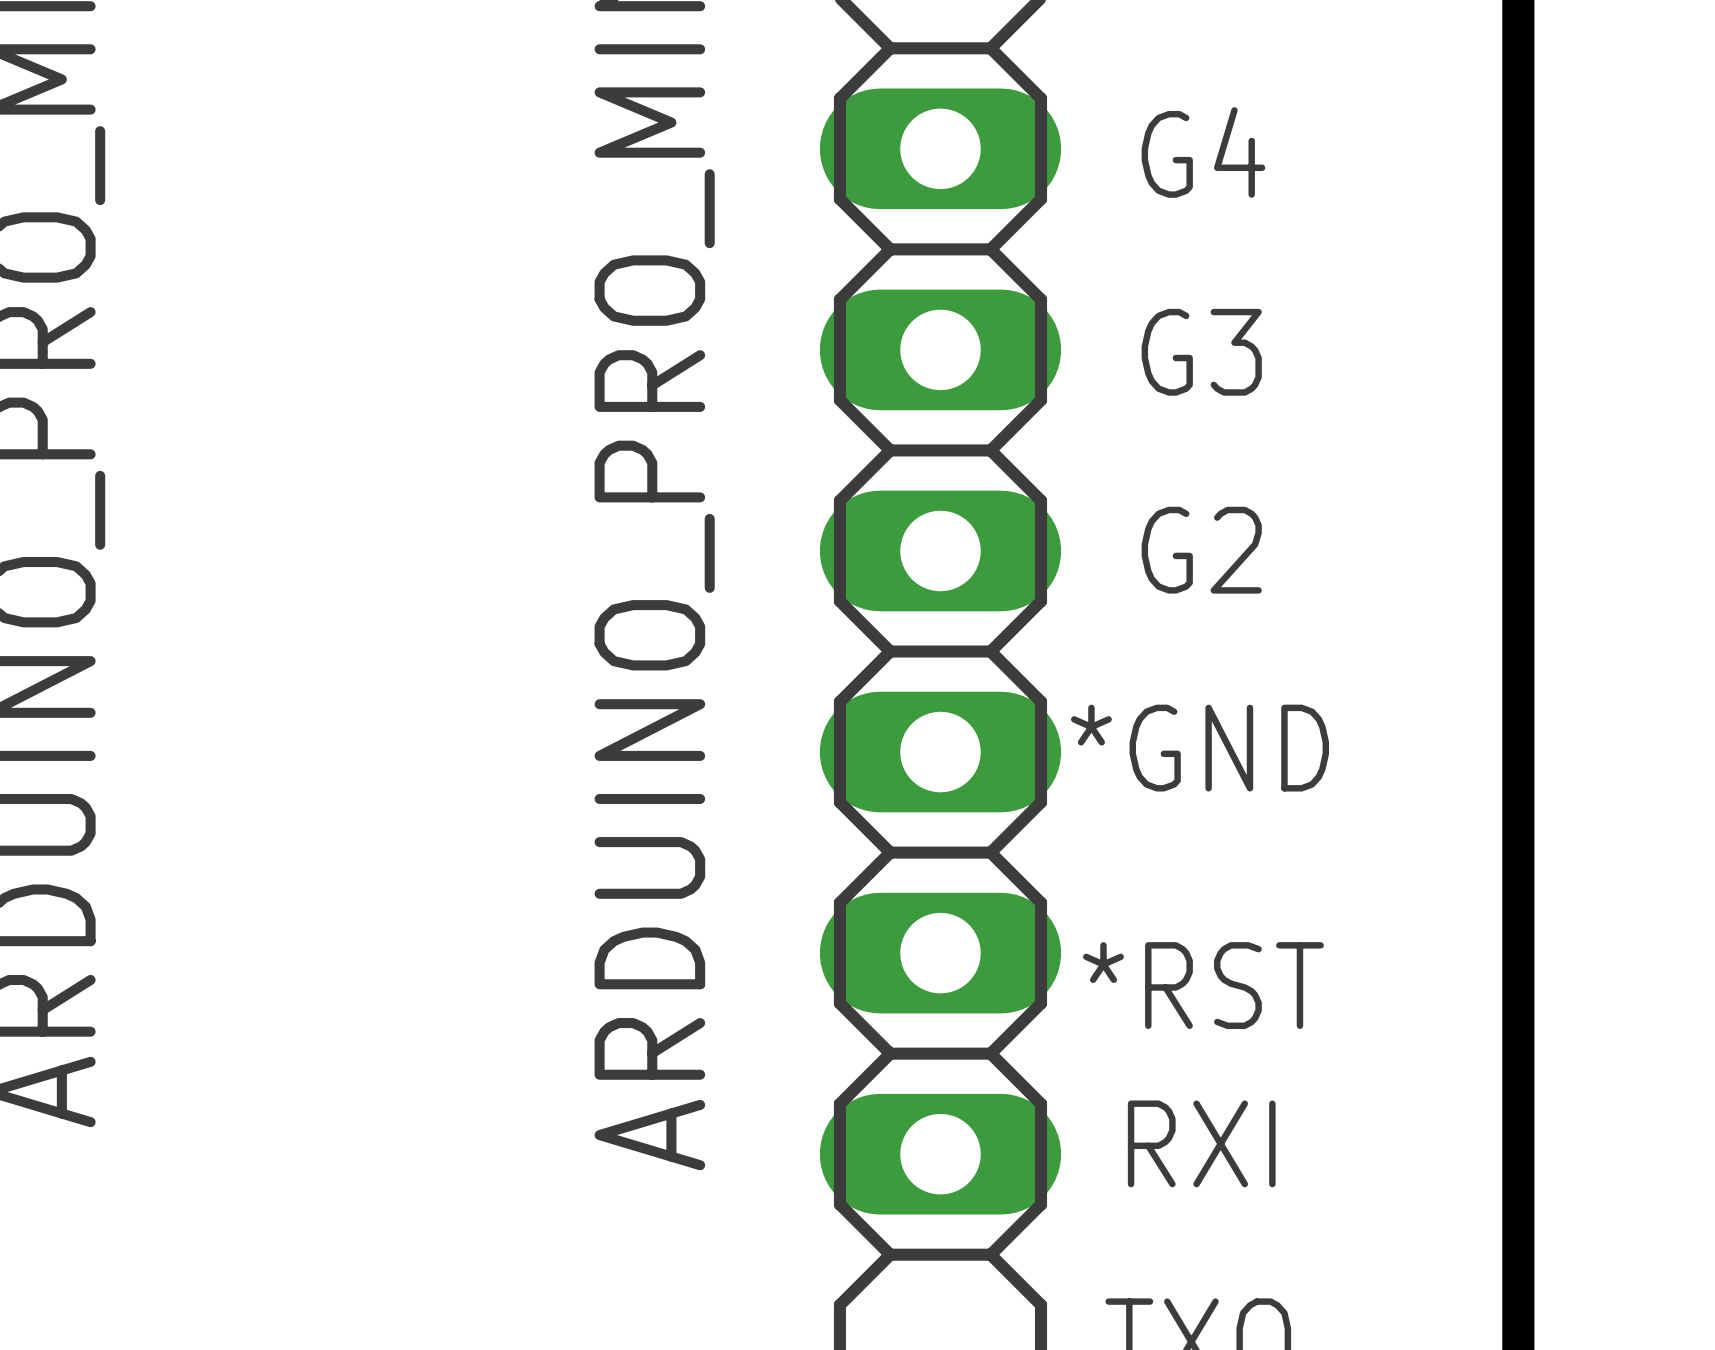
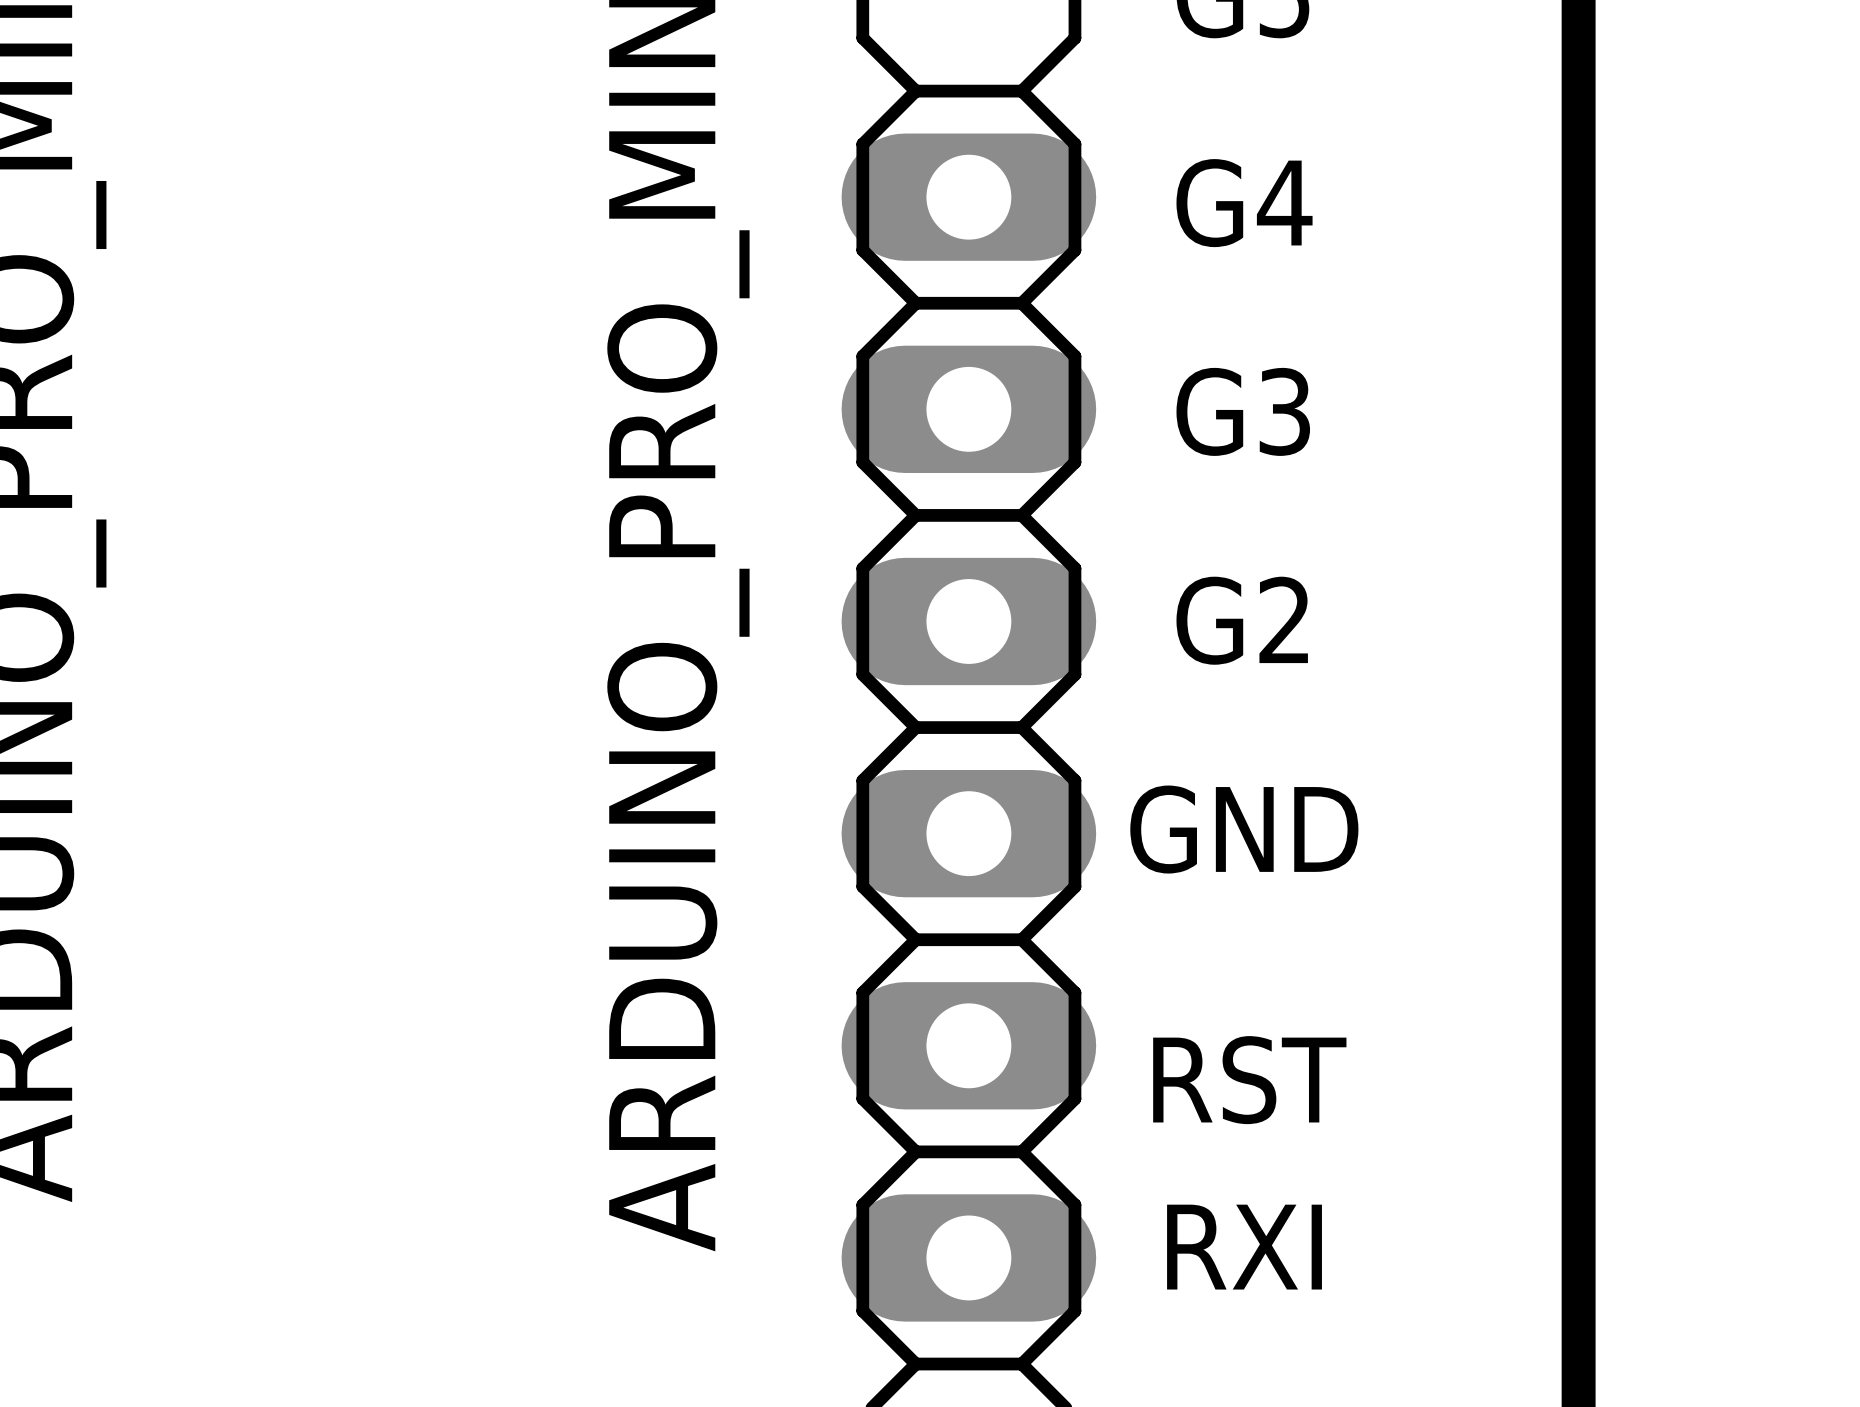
text: *GND (1200, 748) -> GND (1244, 829)
text: *RST (1203, 985) -> RST (1249, 1080)

